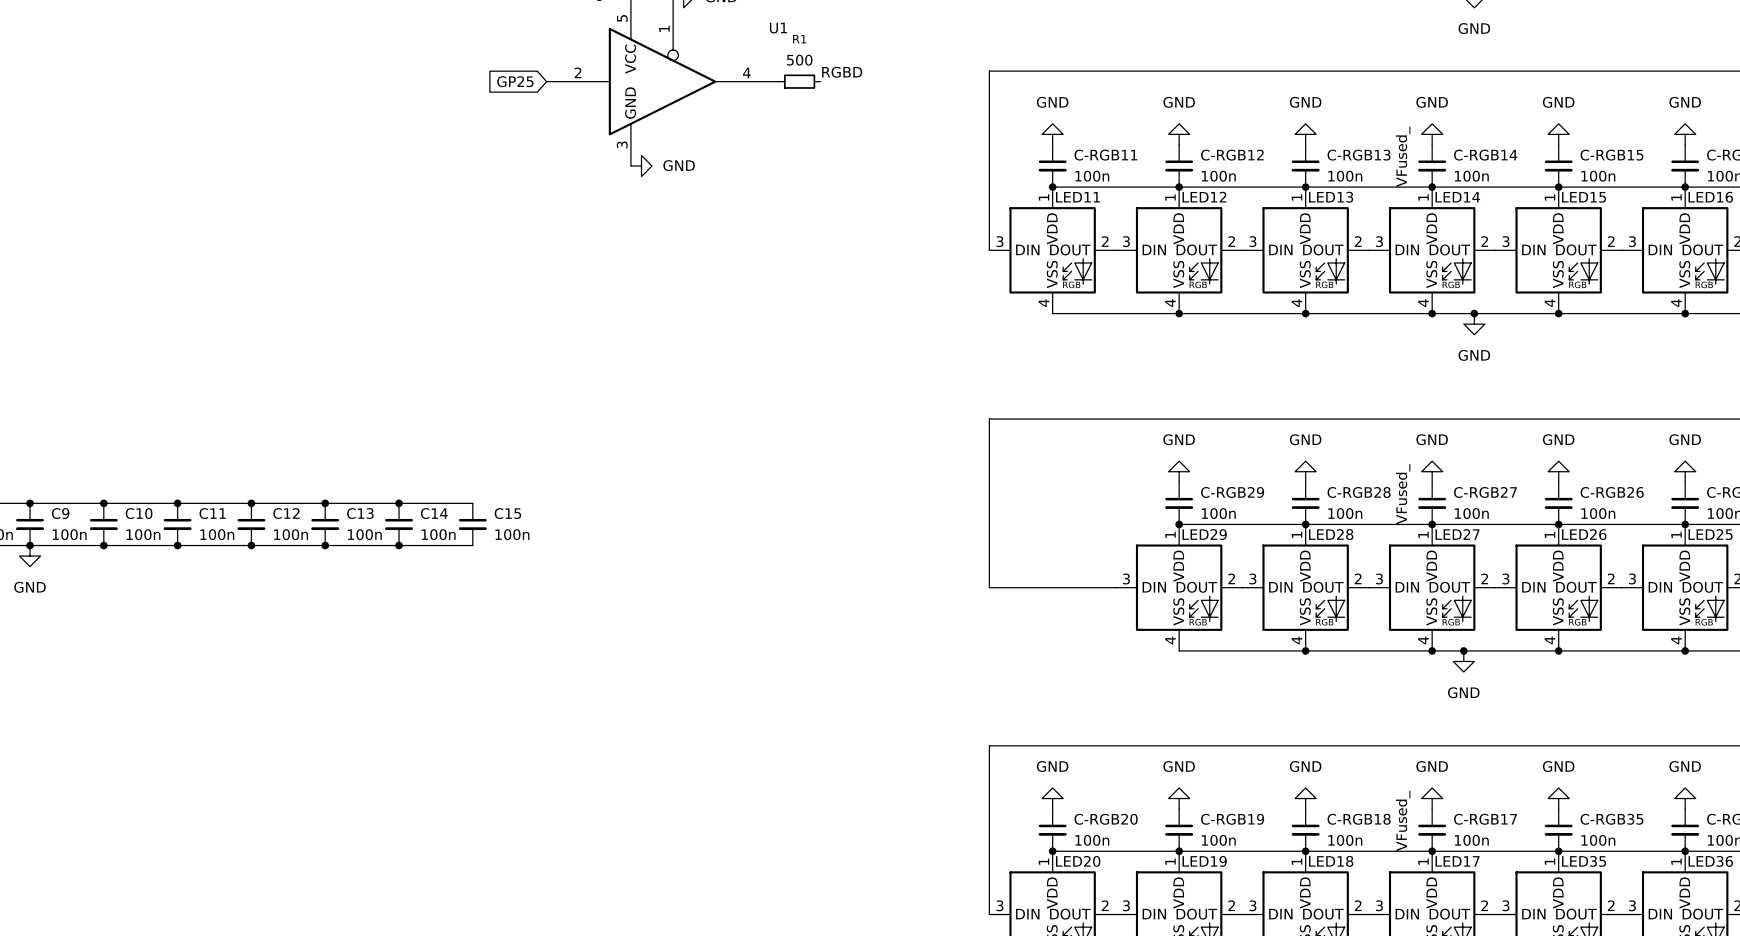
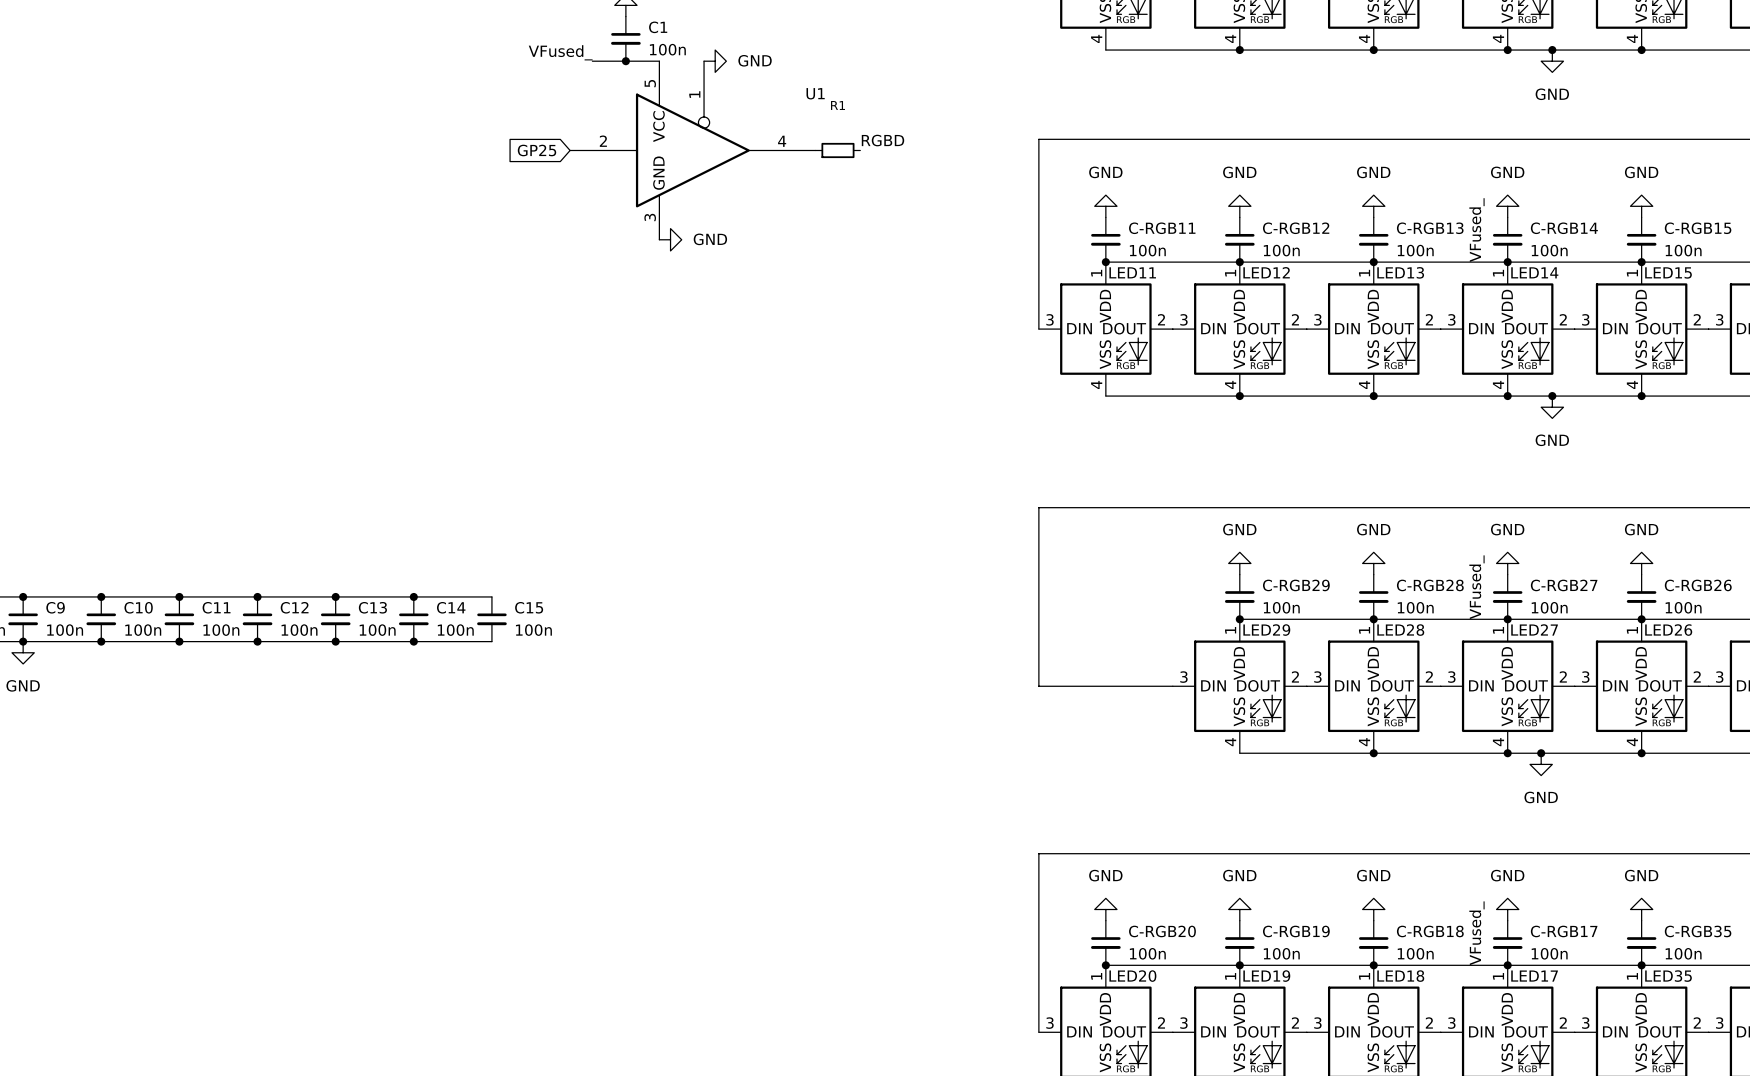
R1 value: 500 (799, 60) -> none

